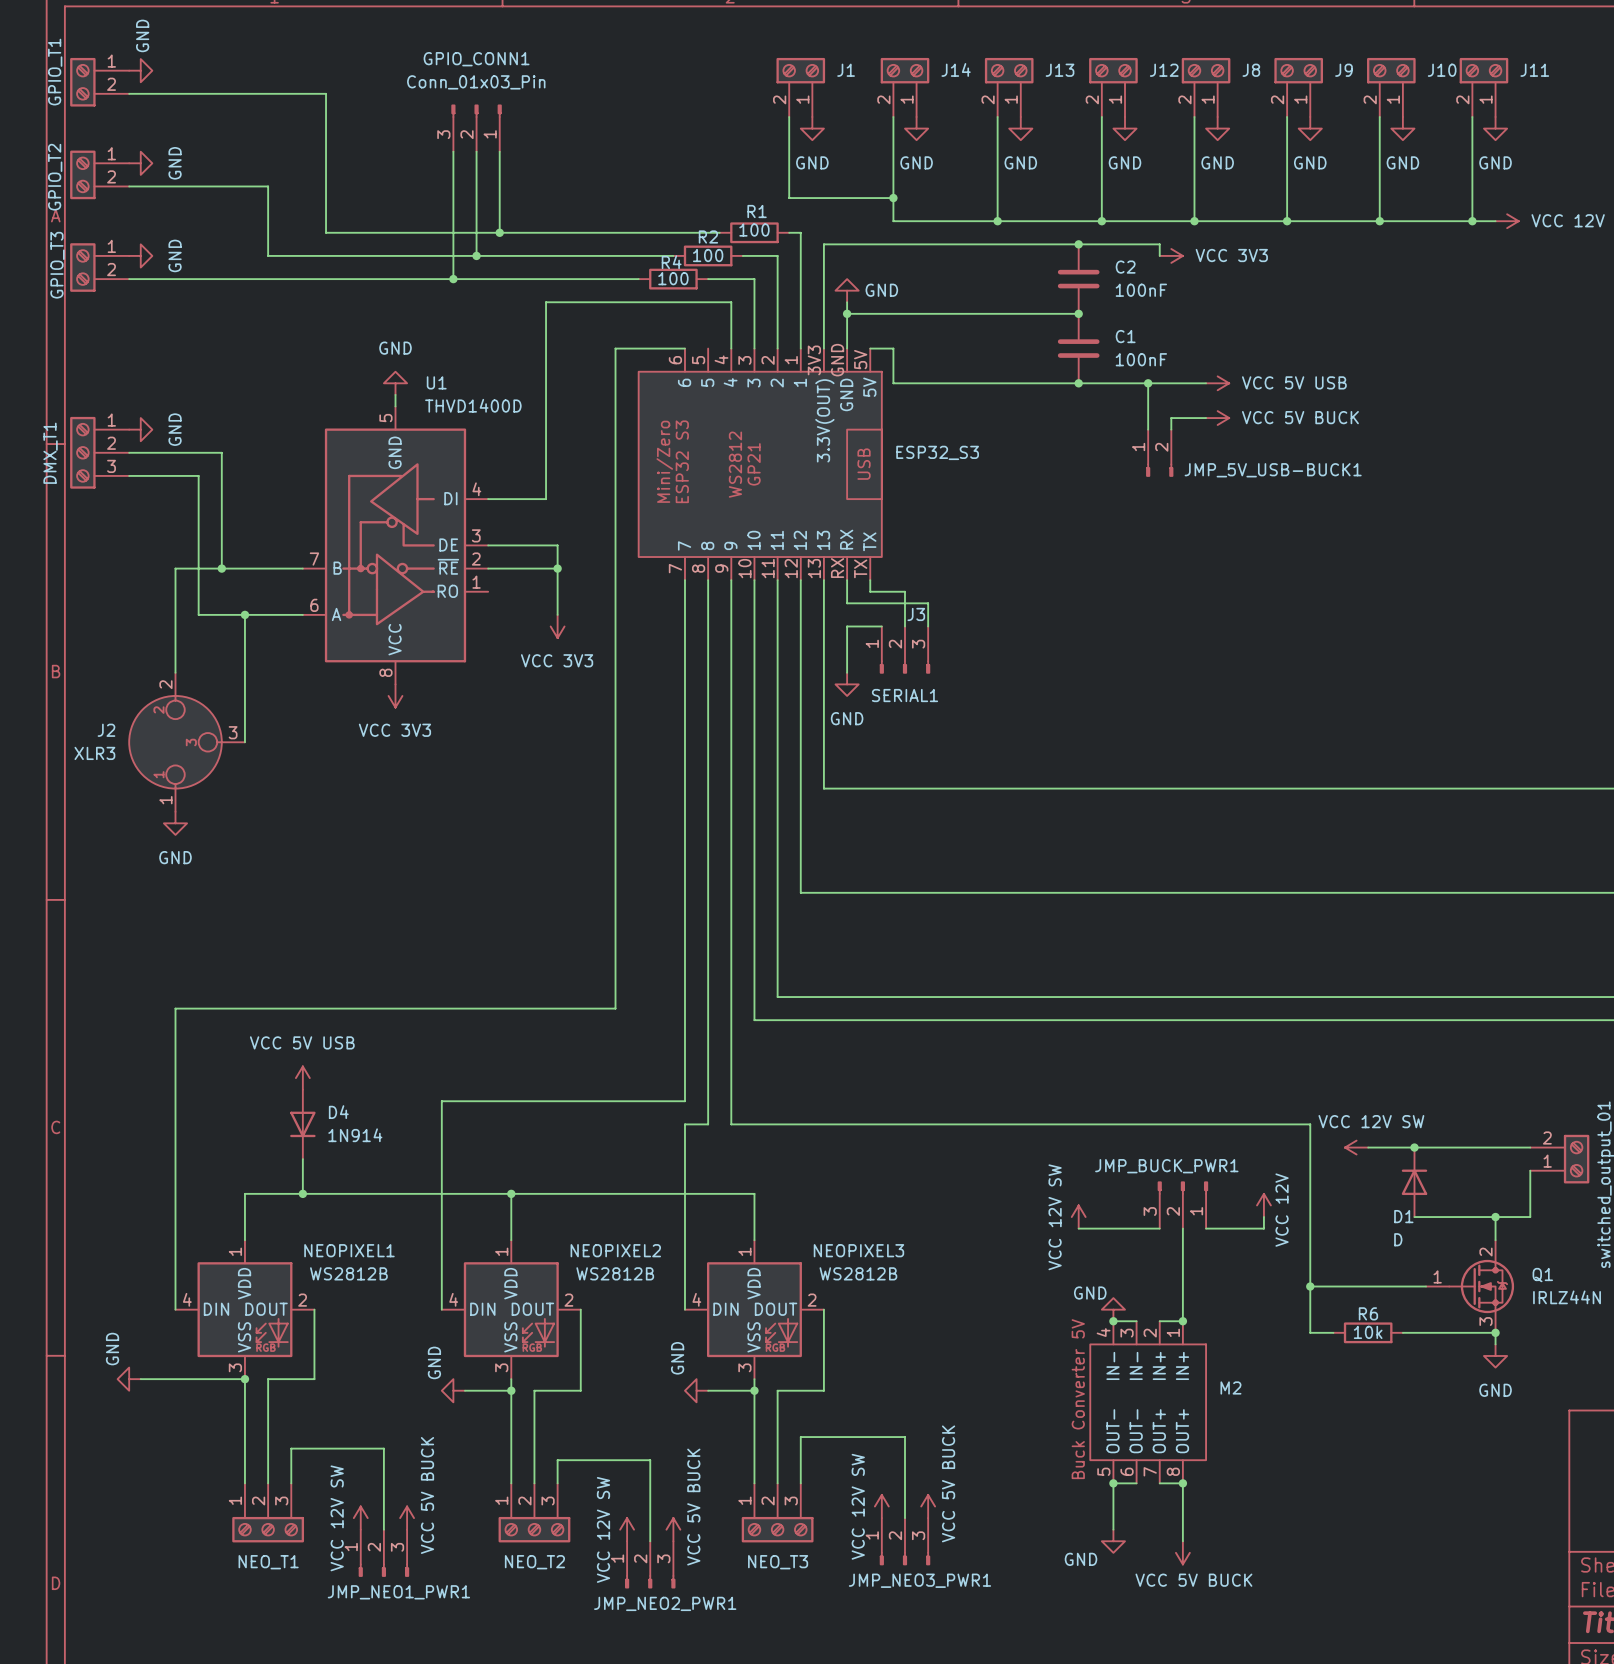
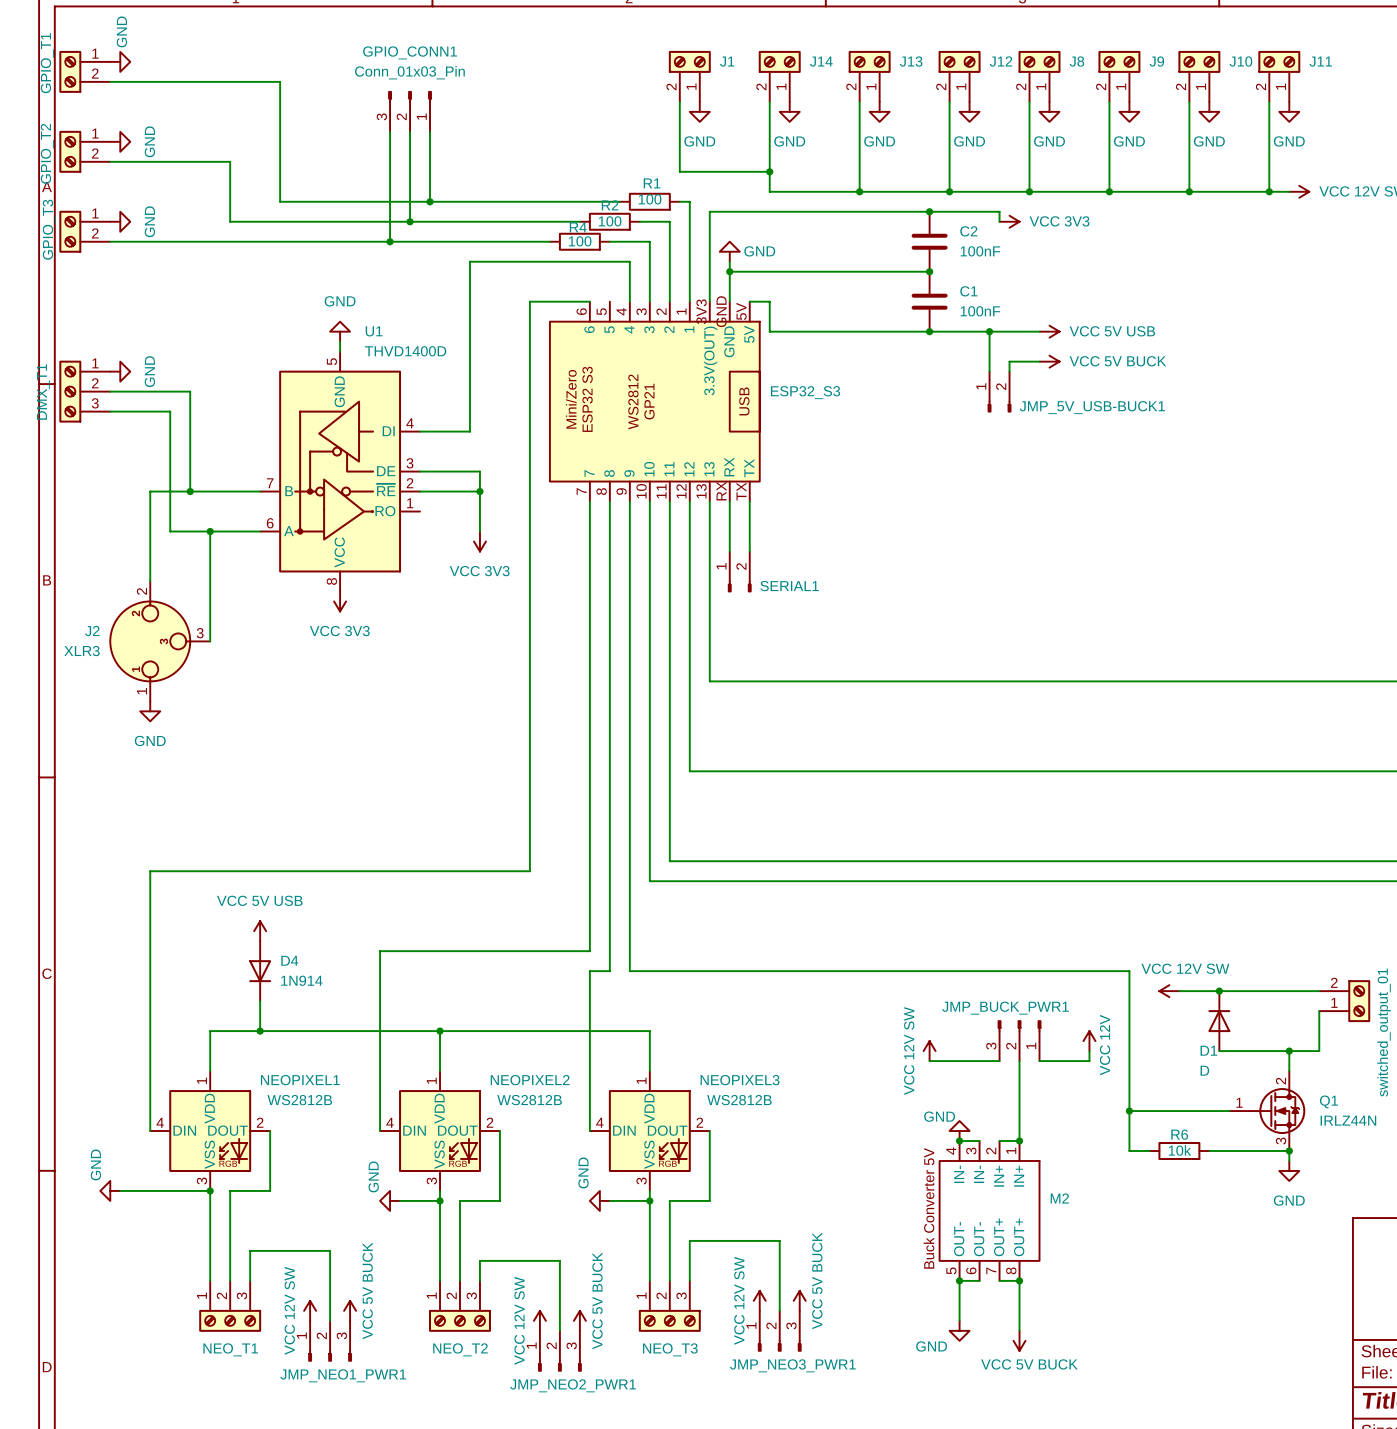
wire: (870, 591) (904, 591) (904, 626) -> (749, 511) (749, 551)
wire: (847, 603) (928, 603) (928, 626) -> none
wire: (847, 626) (881, 626) -> (729, 541) (729, 521)
J3: SERIAL1 (904, 649) -> none
SERIAL1: none -> (739, 571)
power symbol: GND (847, 684) -> none

